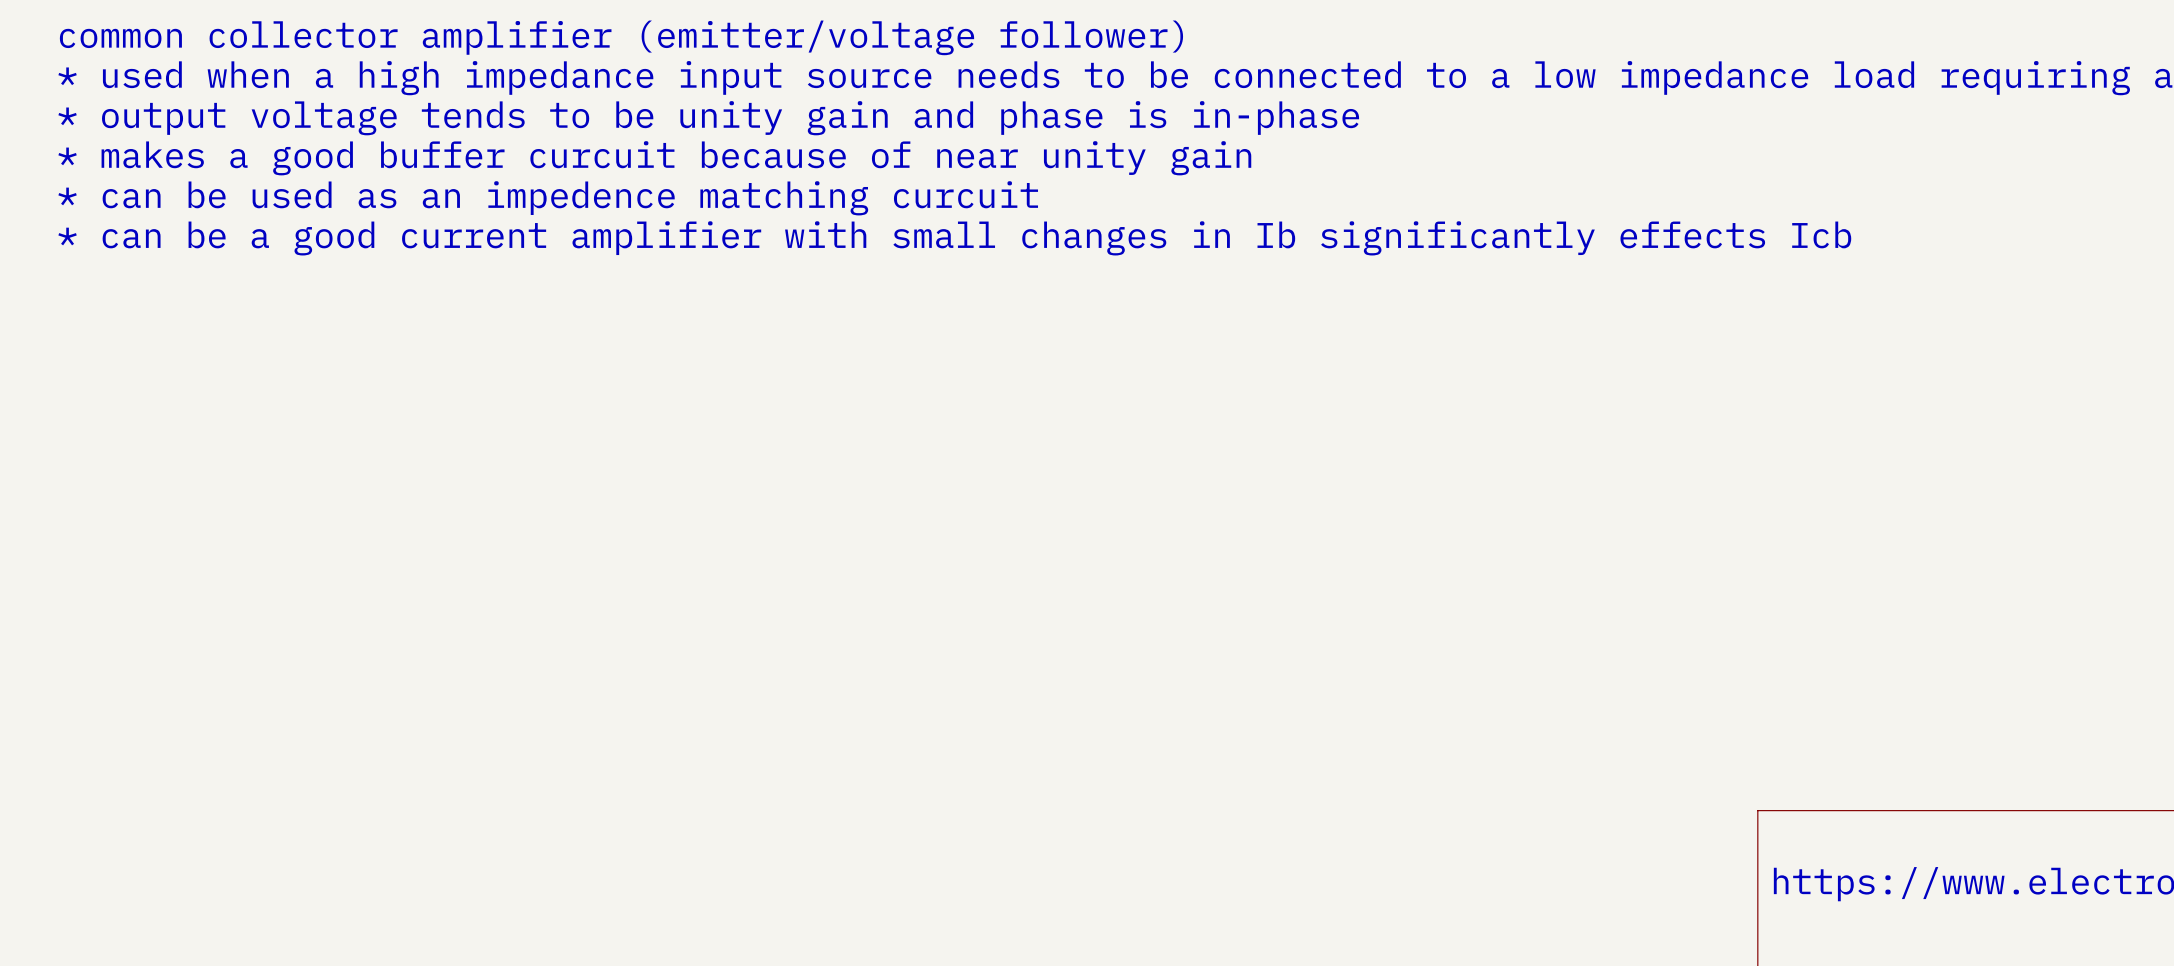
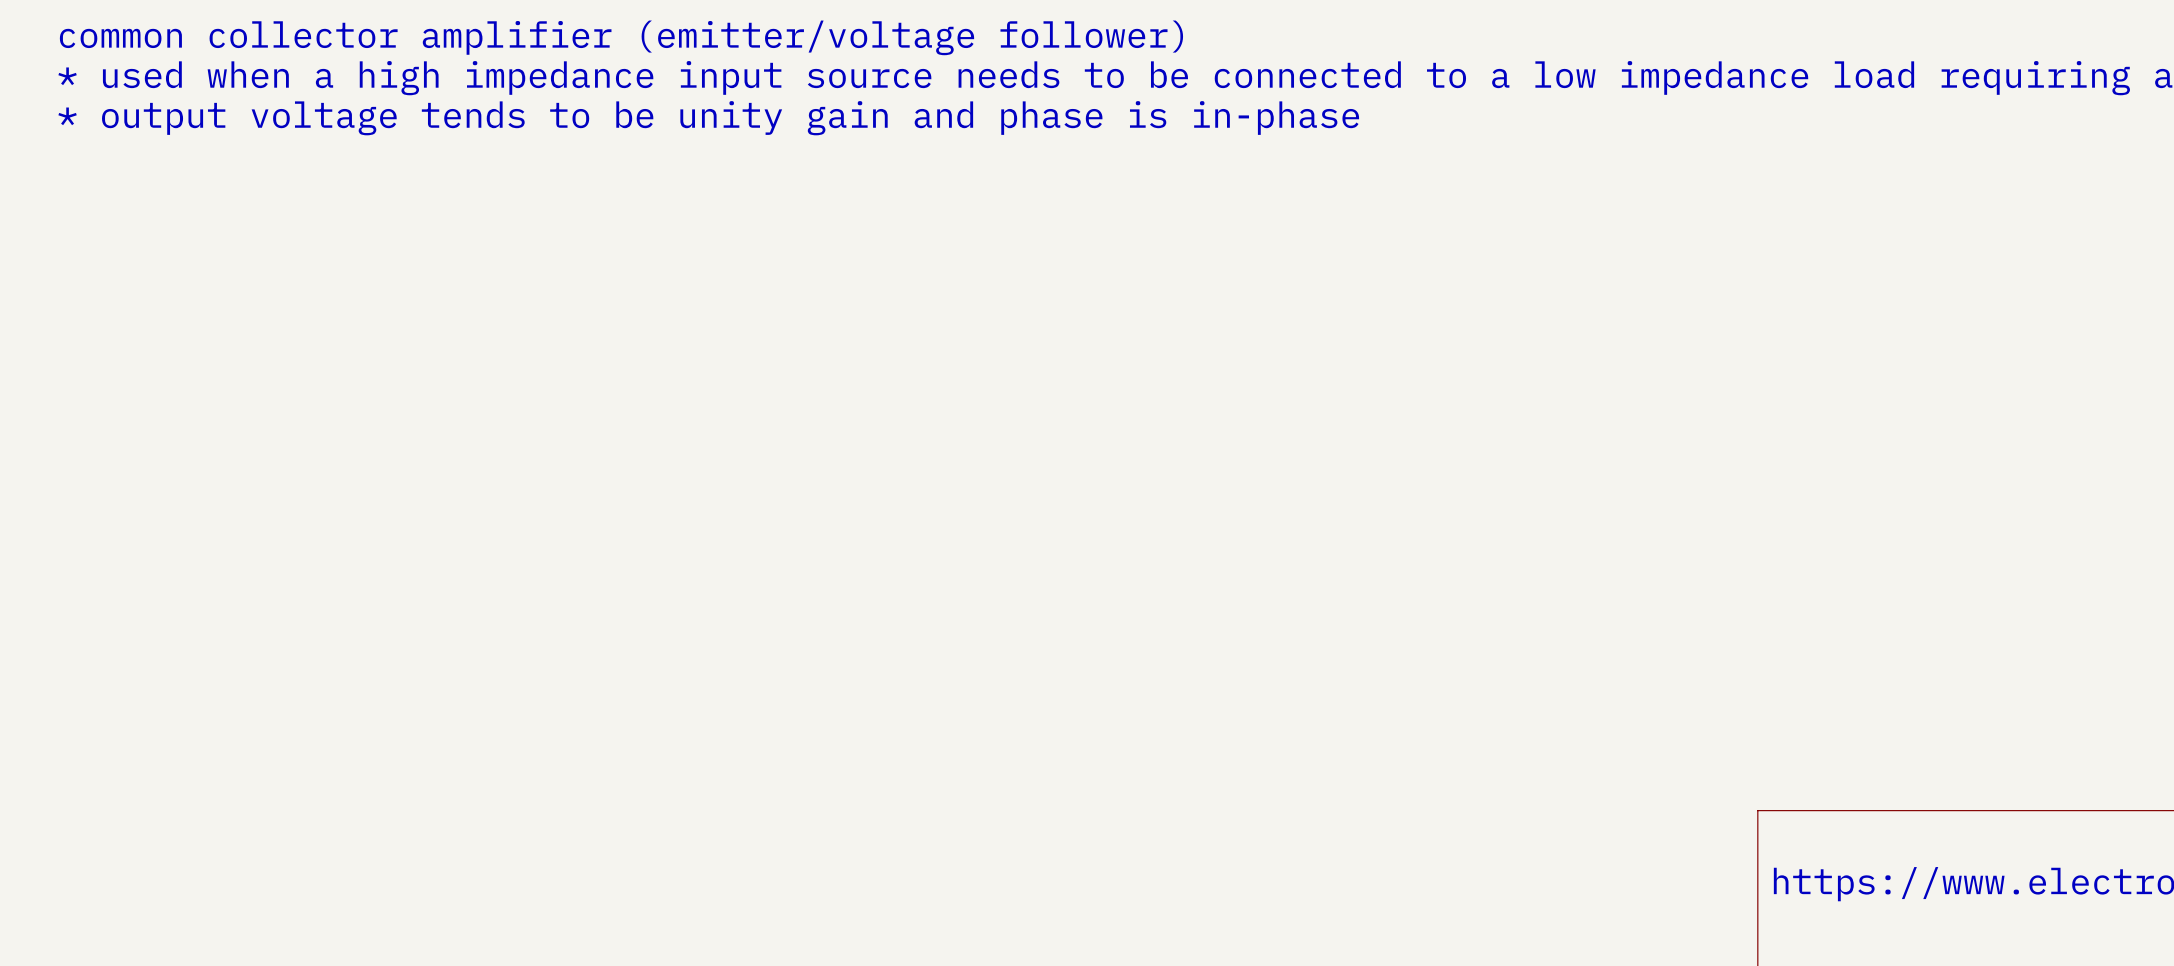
text: * makes a good buffer curcuit because of near unity gain (654, 158) -> none
text: * can be used as an impedence matching curcuit (548, 198) -> none
text: * can be a good current amplifier with small changes in Ib significantly effects Icb (954, 238) -> none

